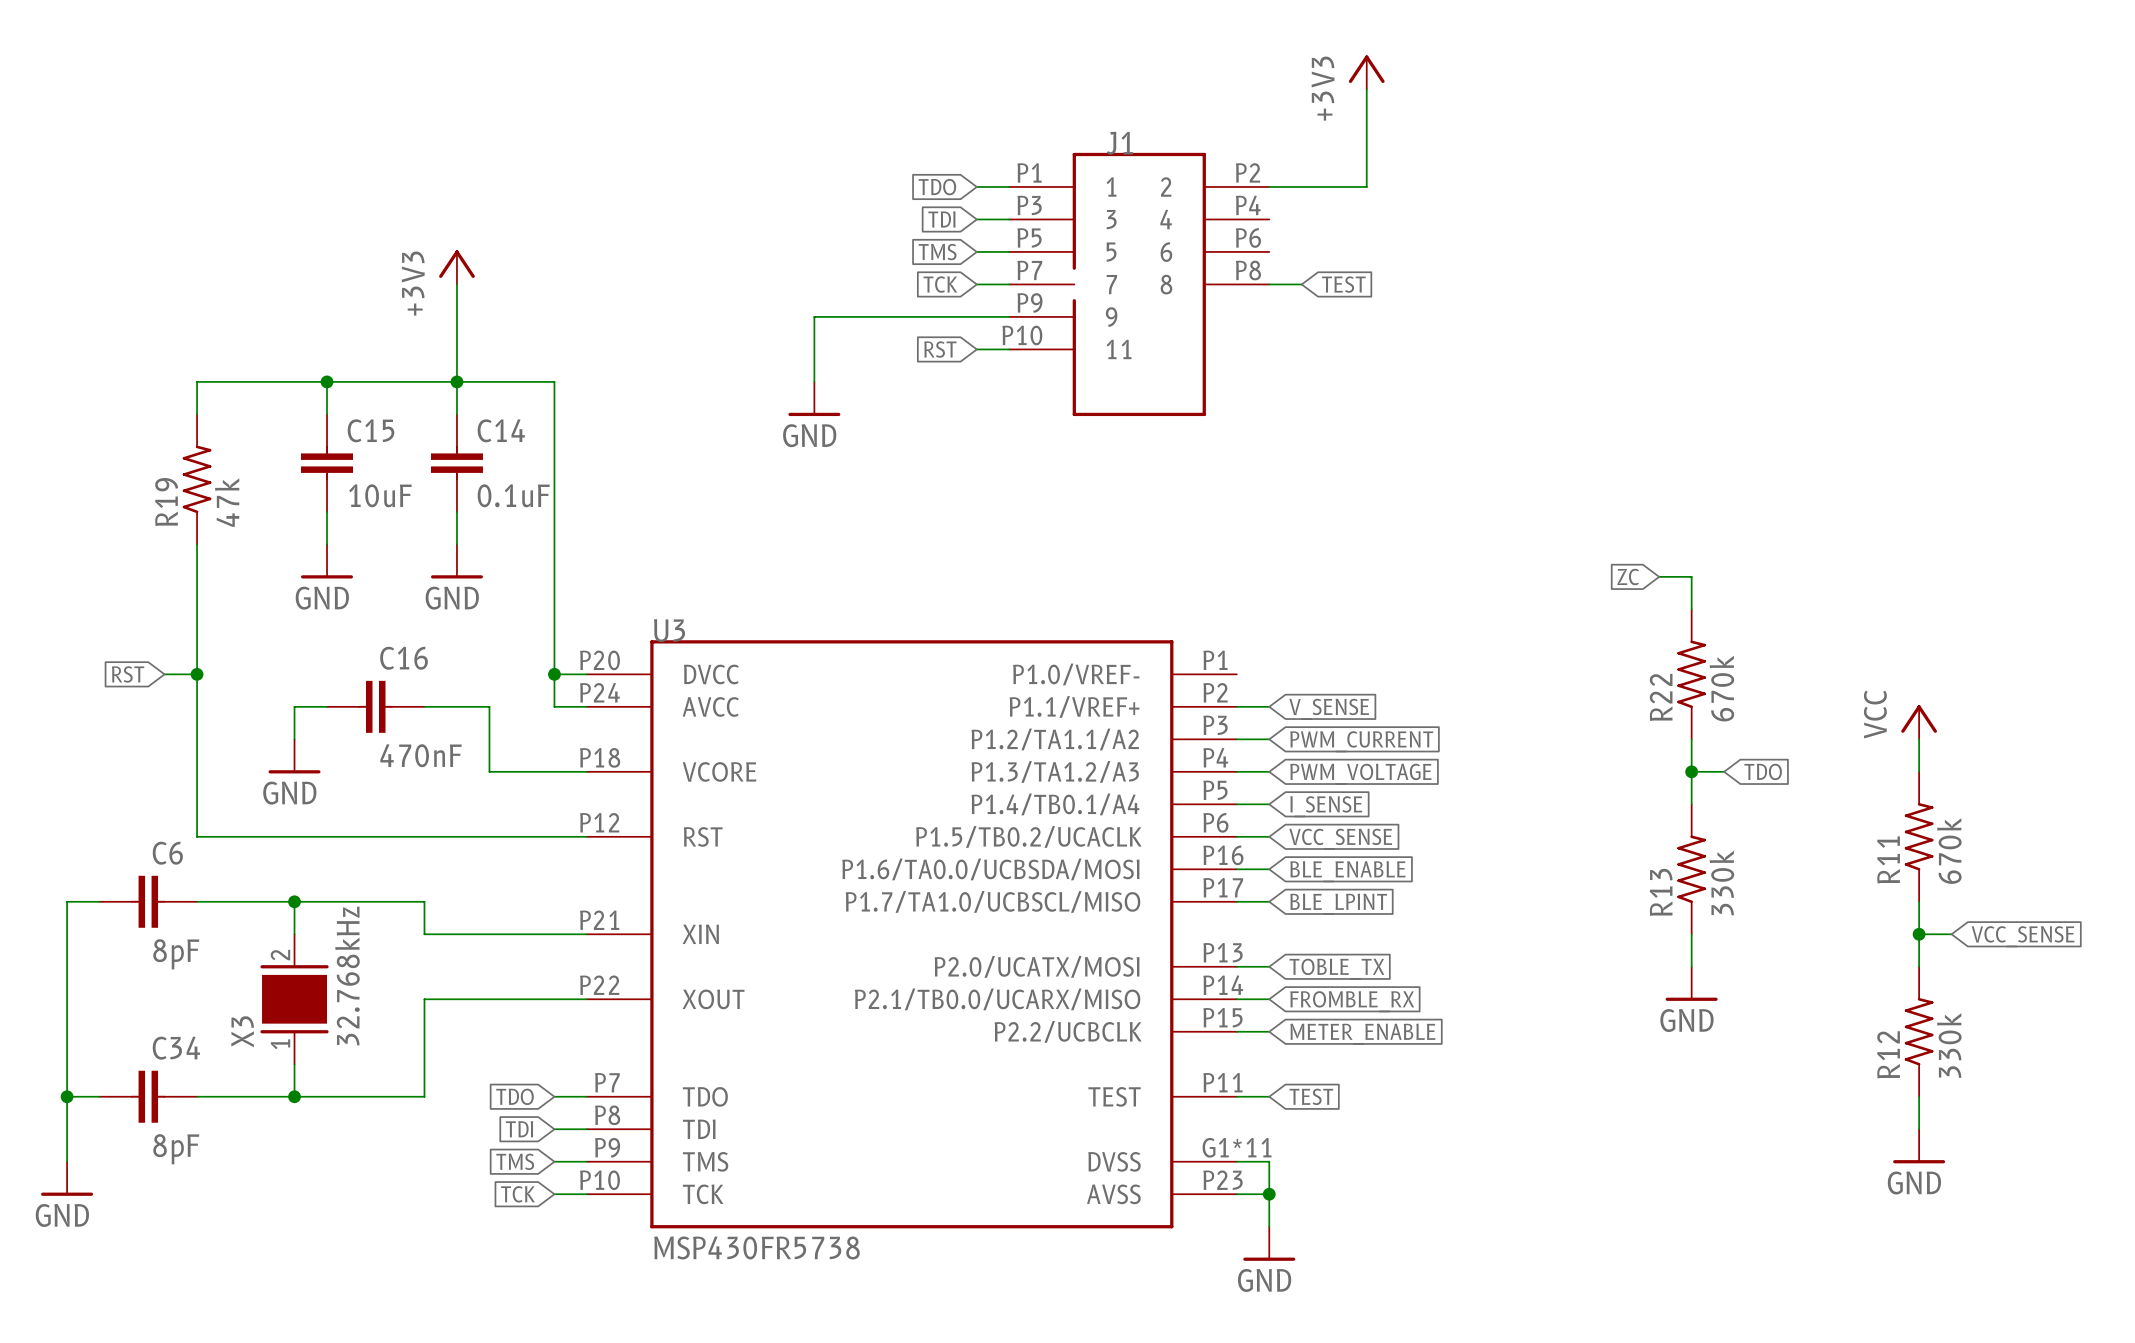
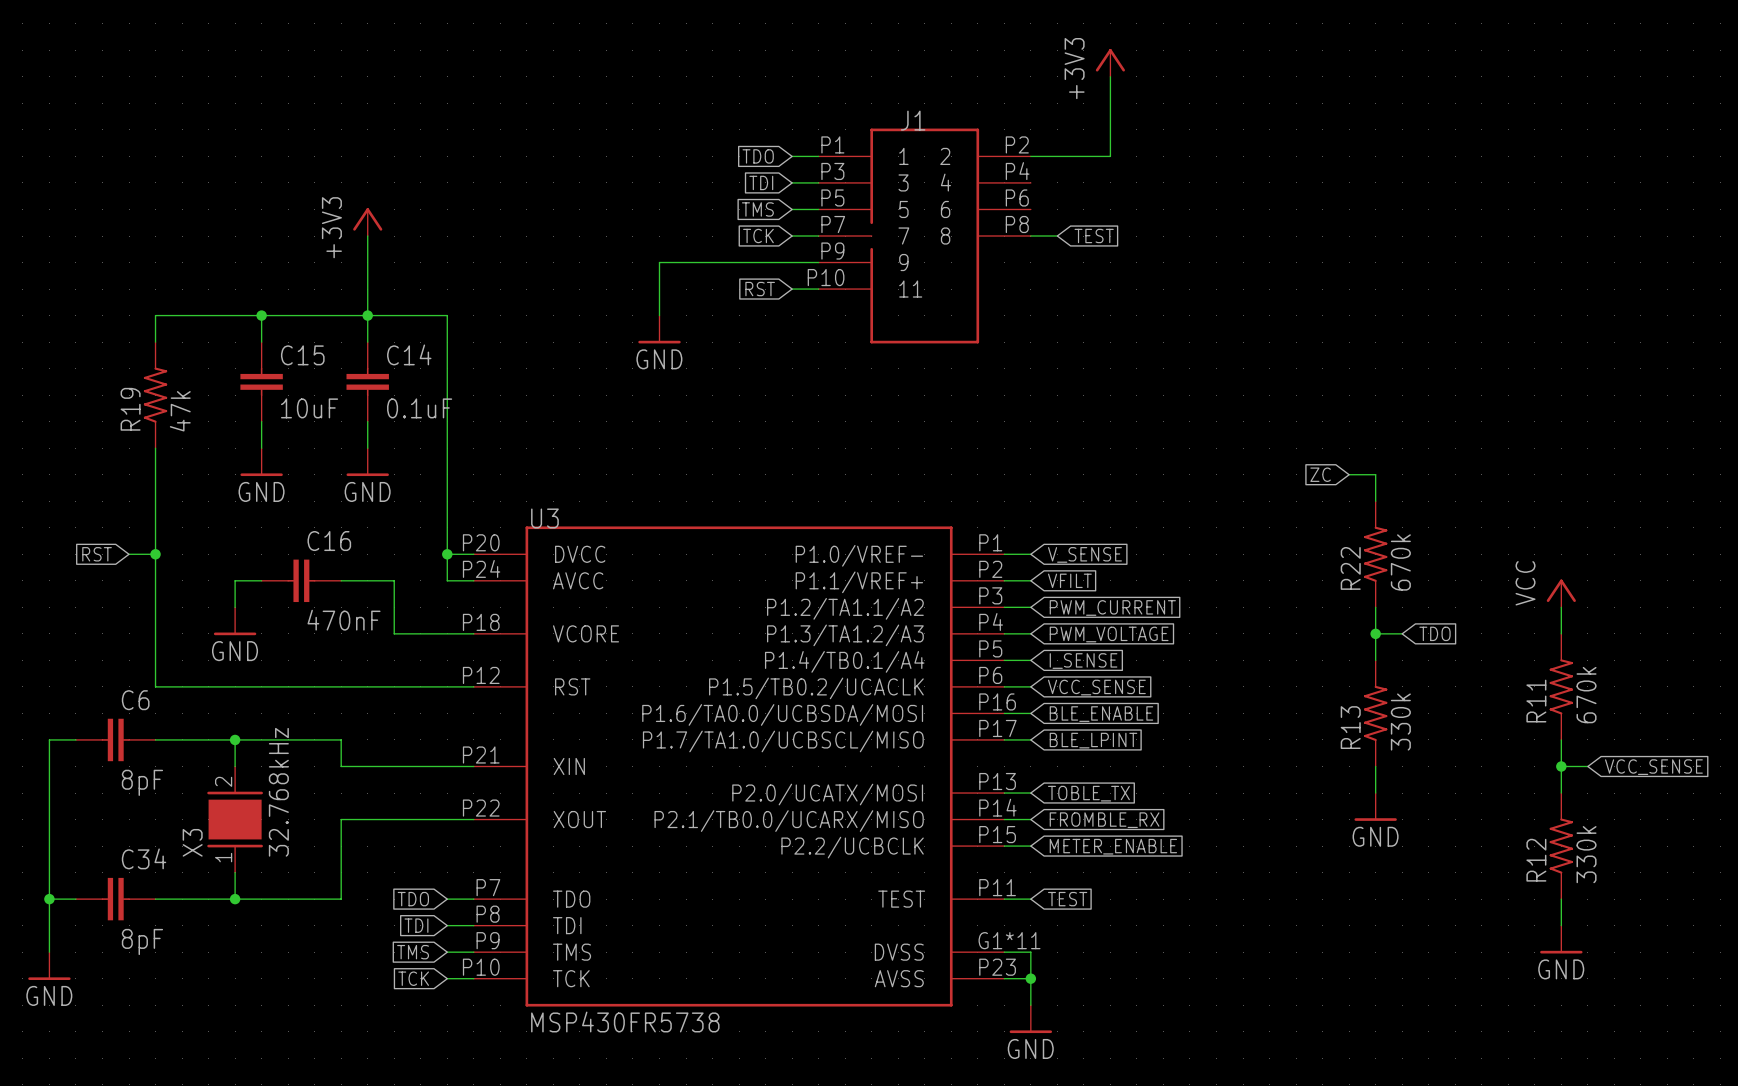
wire: none -> (1004, 554) (1030, 554)
global label: none -> V_SENSE (1084, 554)
global label: V_SENSE (1329, 709) -> VFILT (1069, 580)

